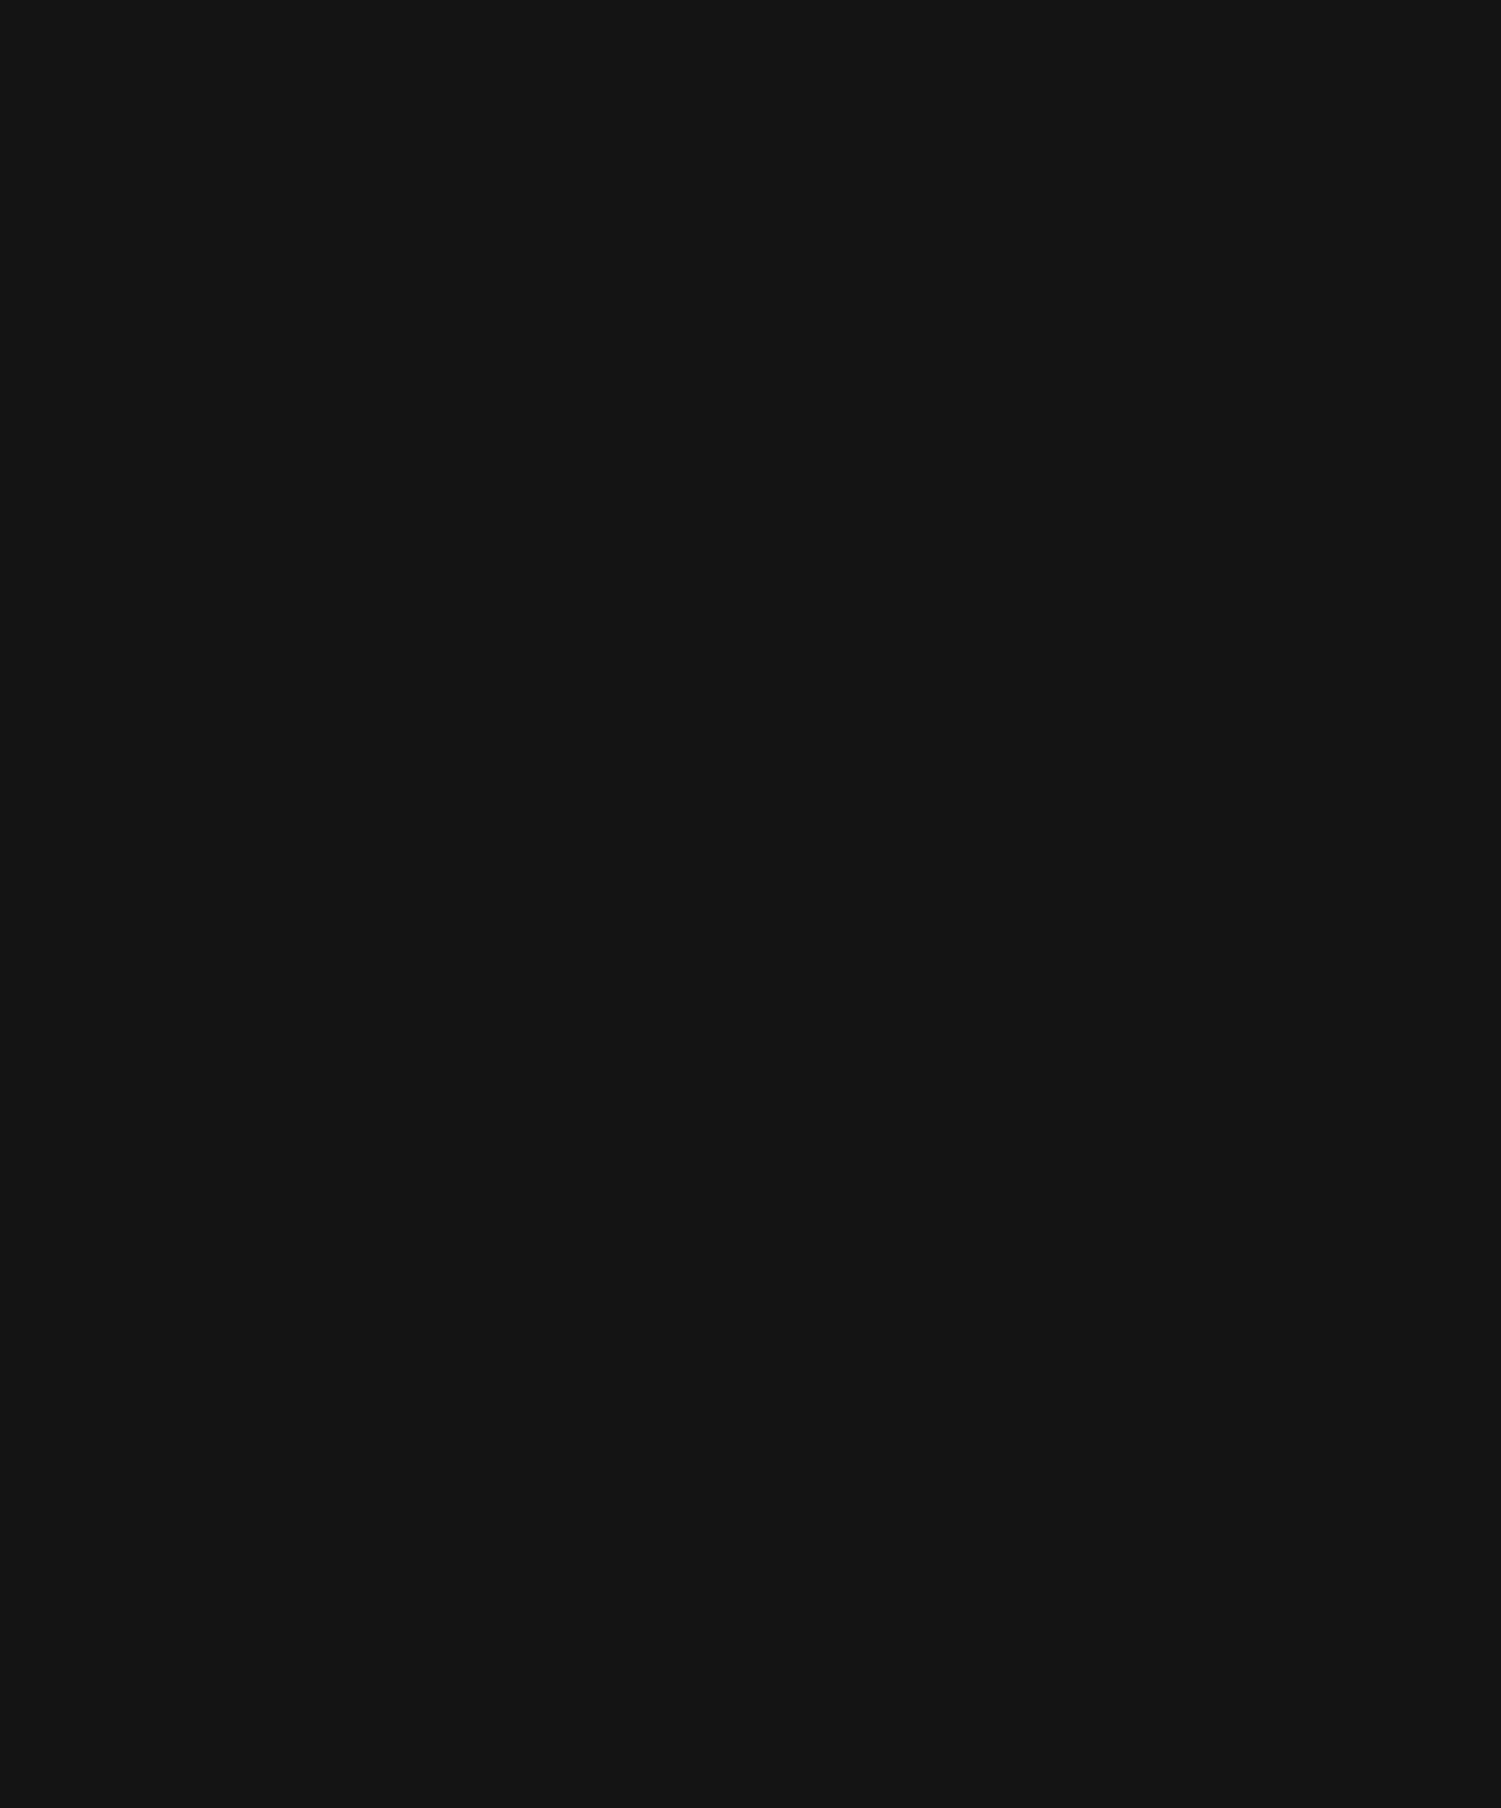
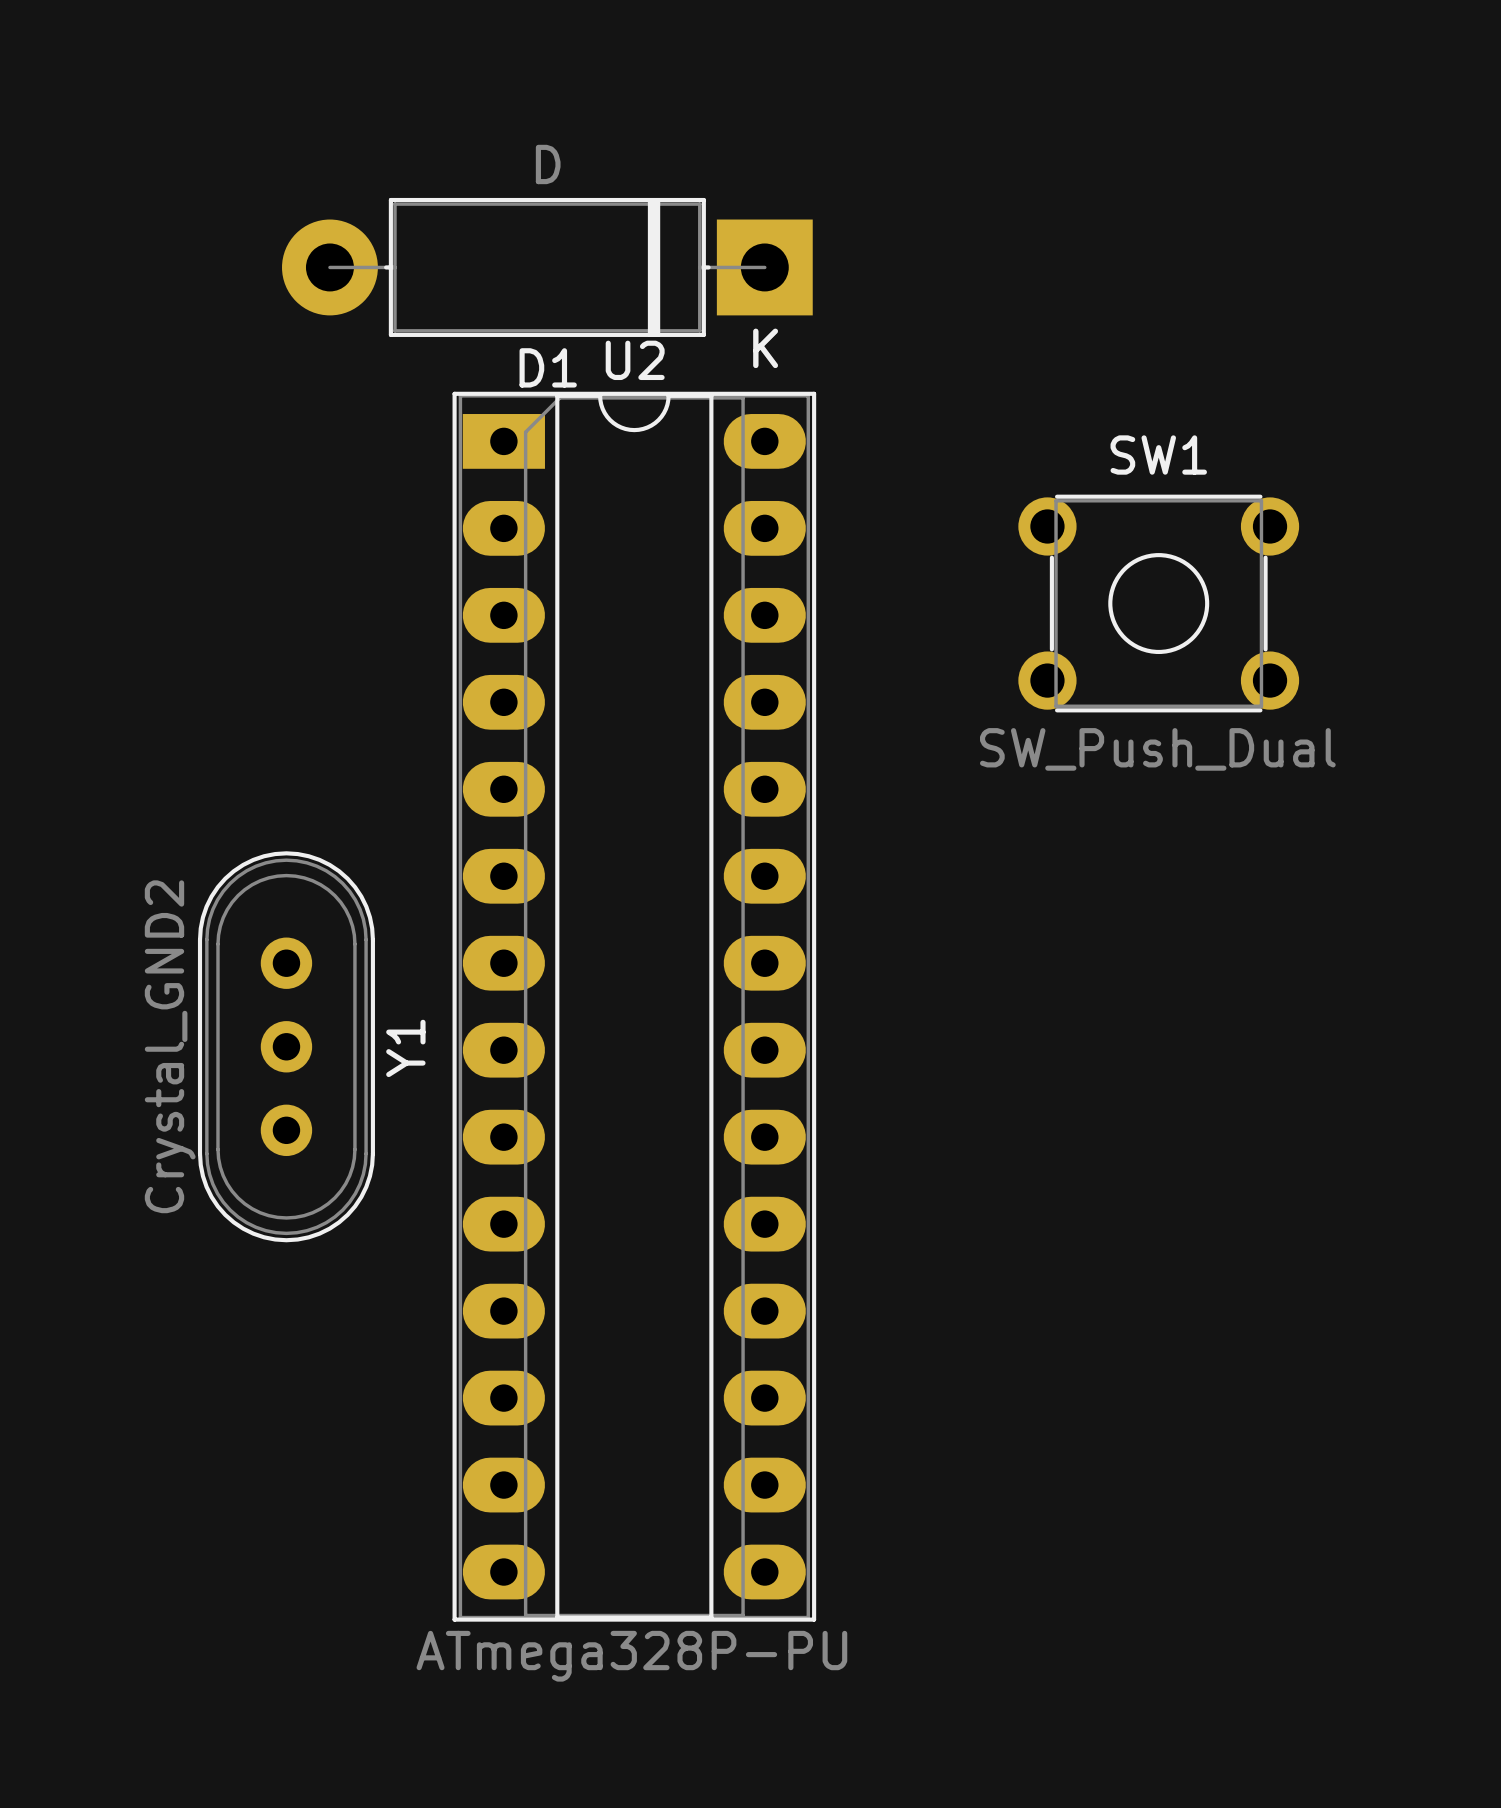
D1: none -> D (547, 267)
SW1: none -> SW_Push_Dual (1158, 603)
U2: none -> ATmega328P-PU (634, 1006)
Y1: none -> Crystal_GND2 (286, 1046)

